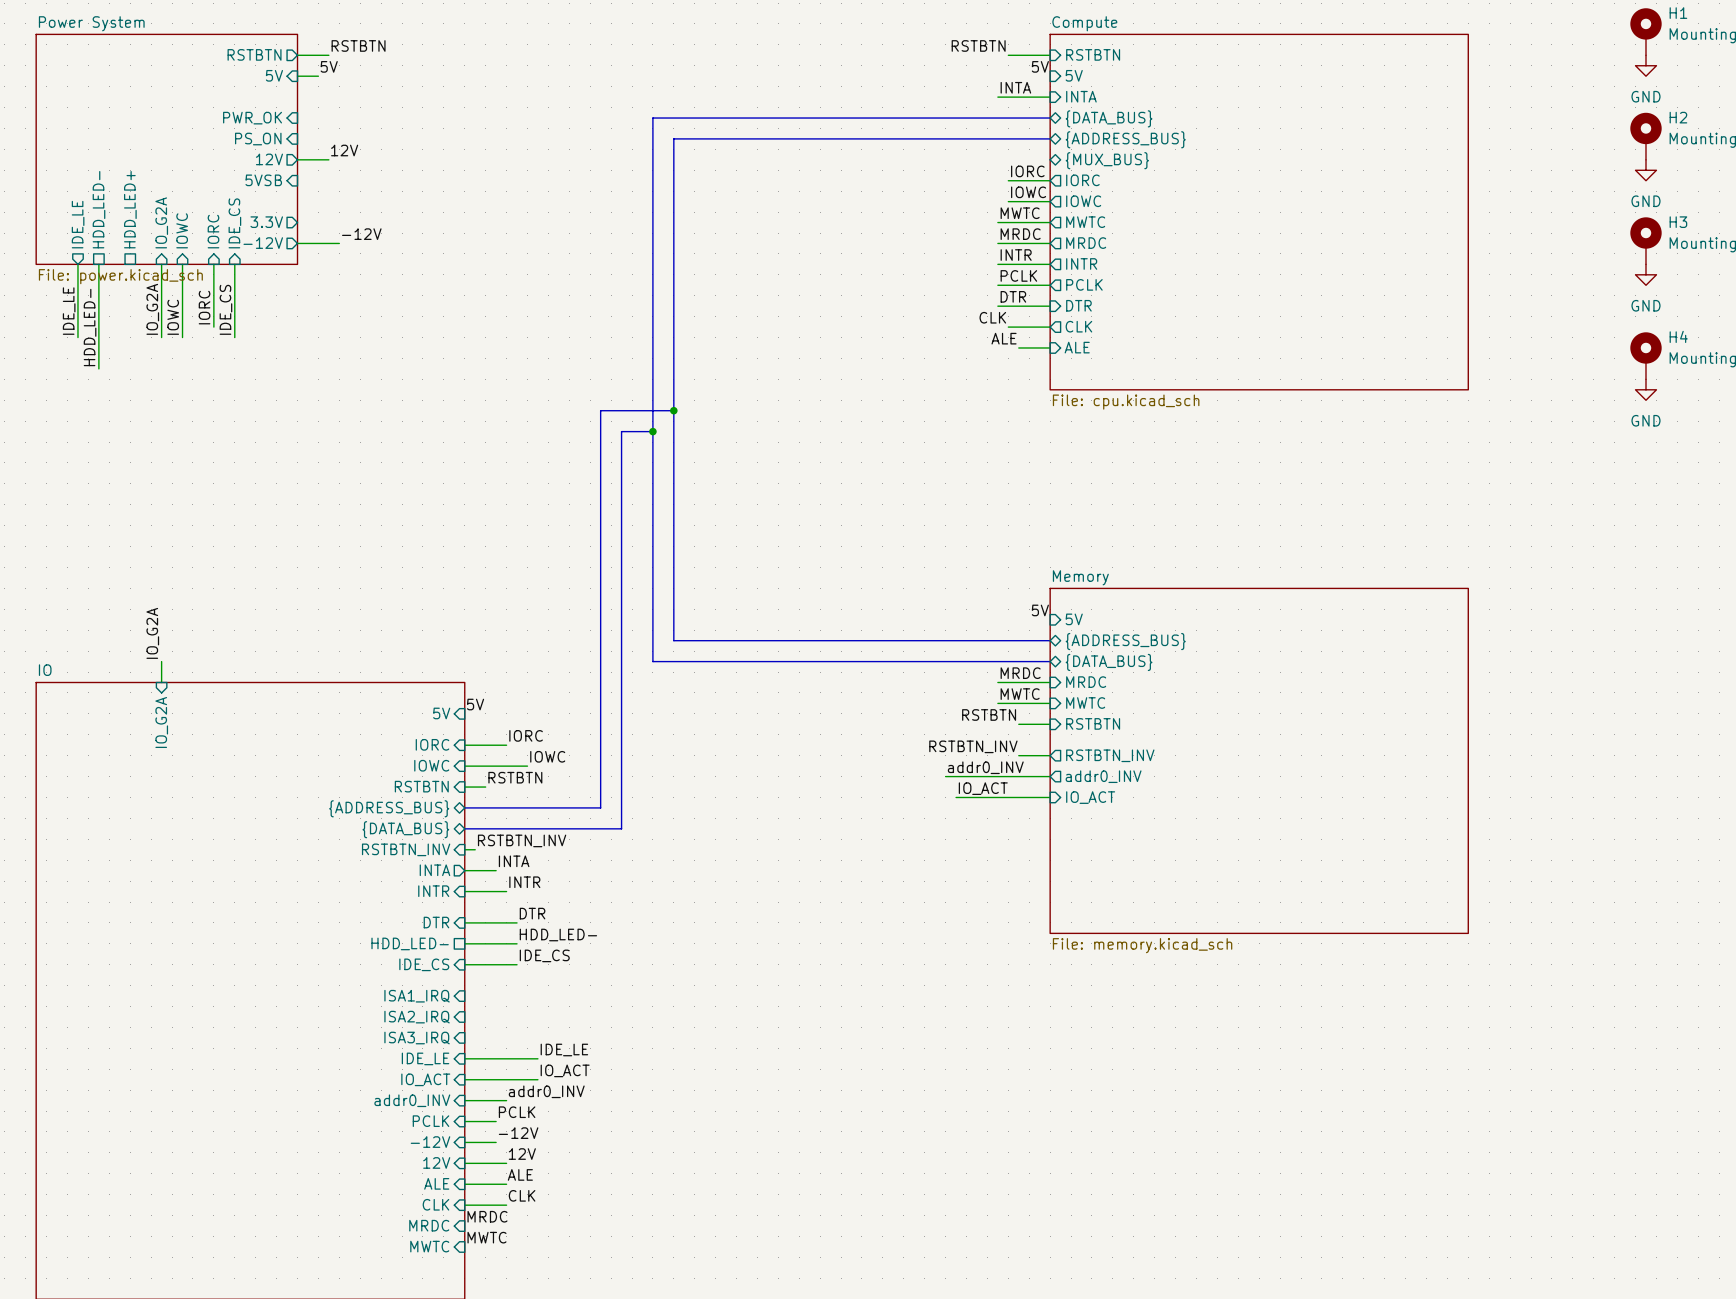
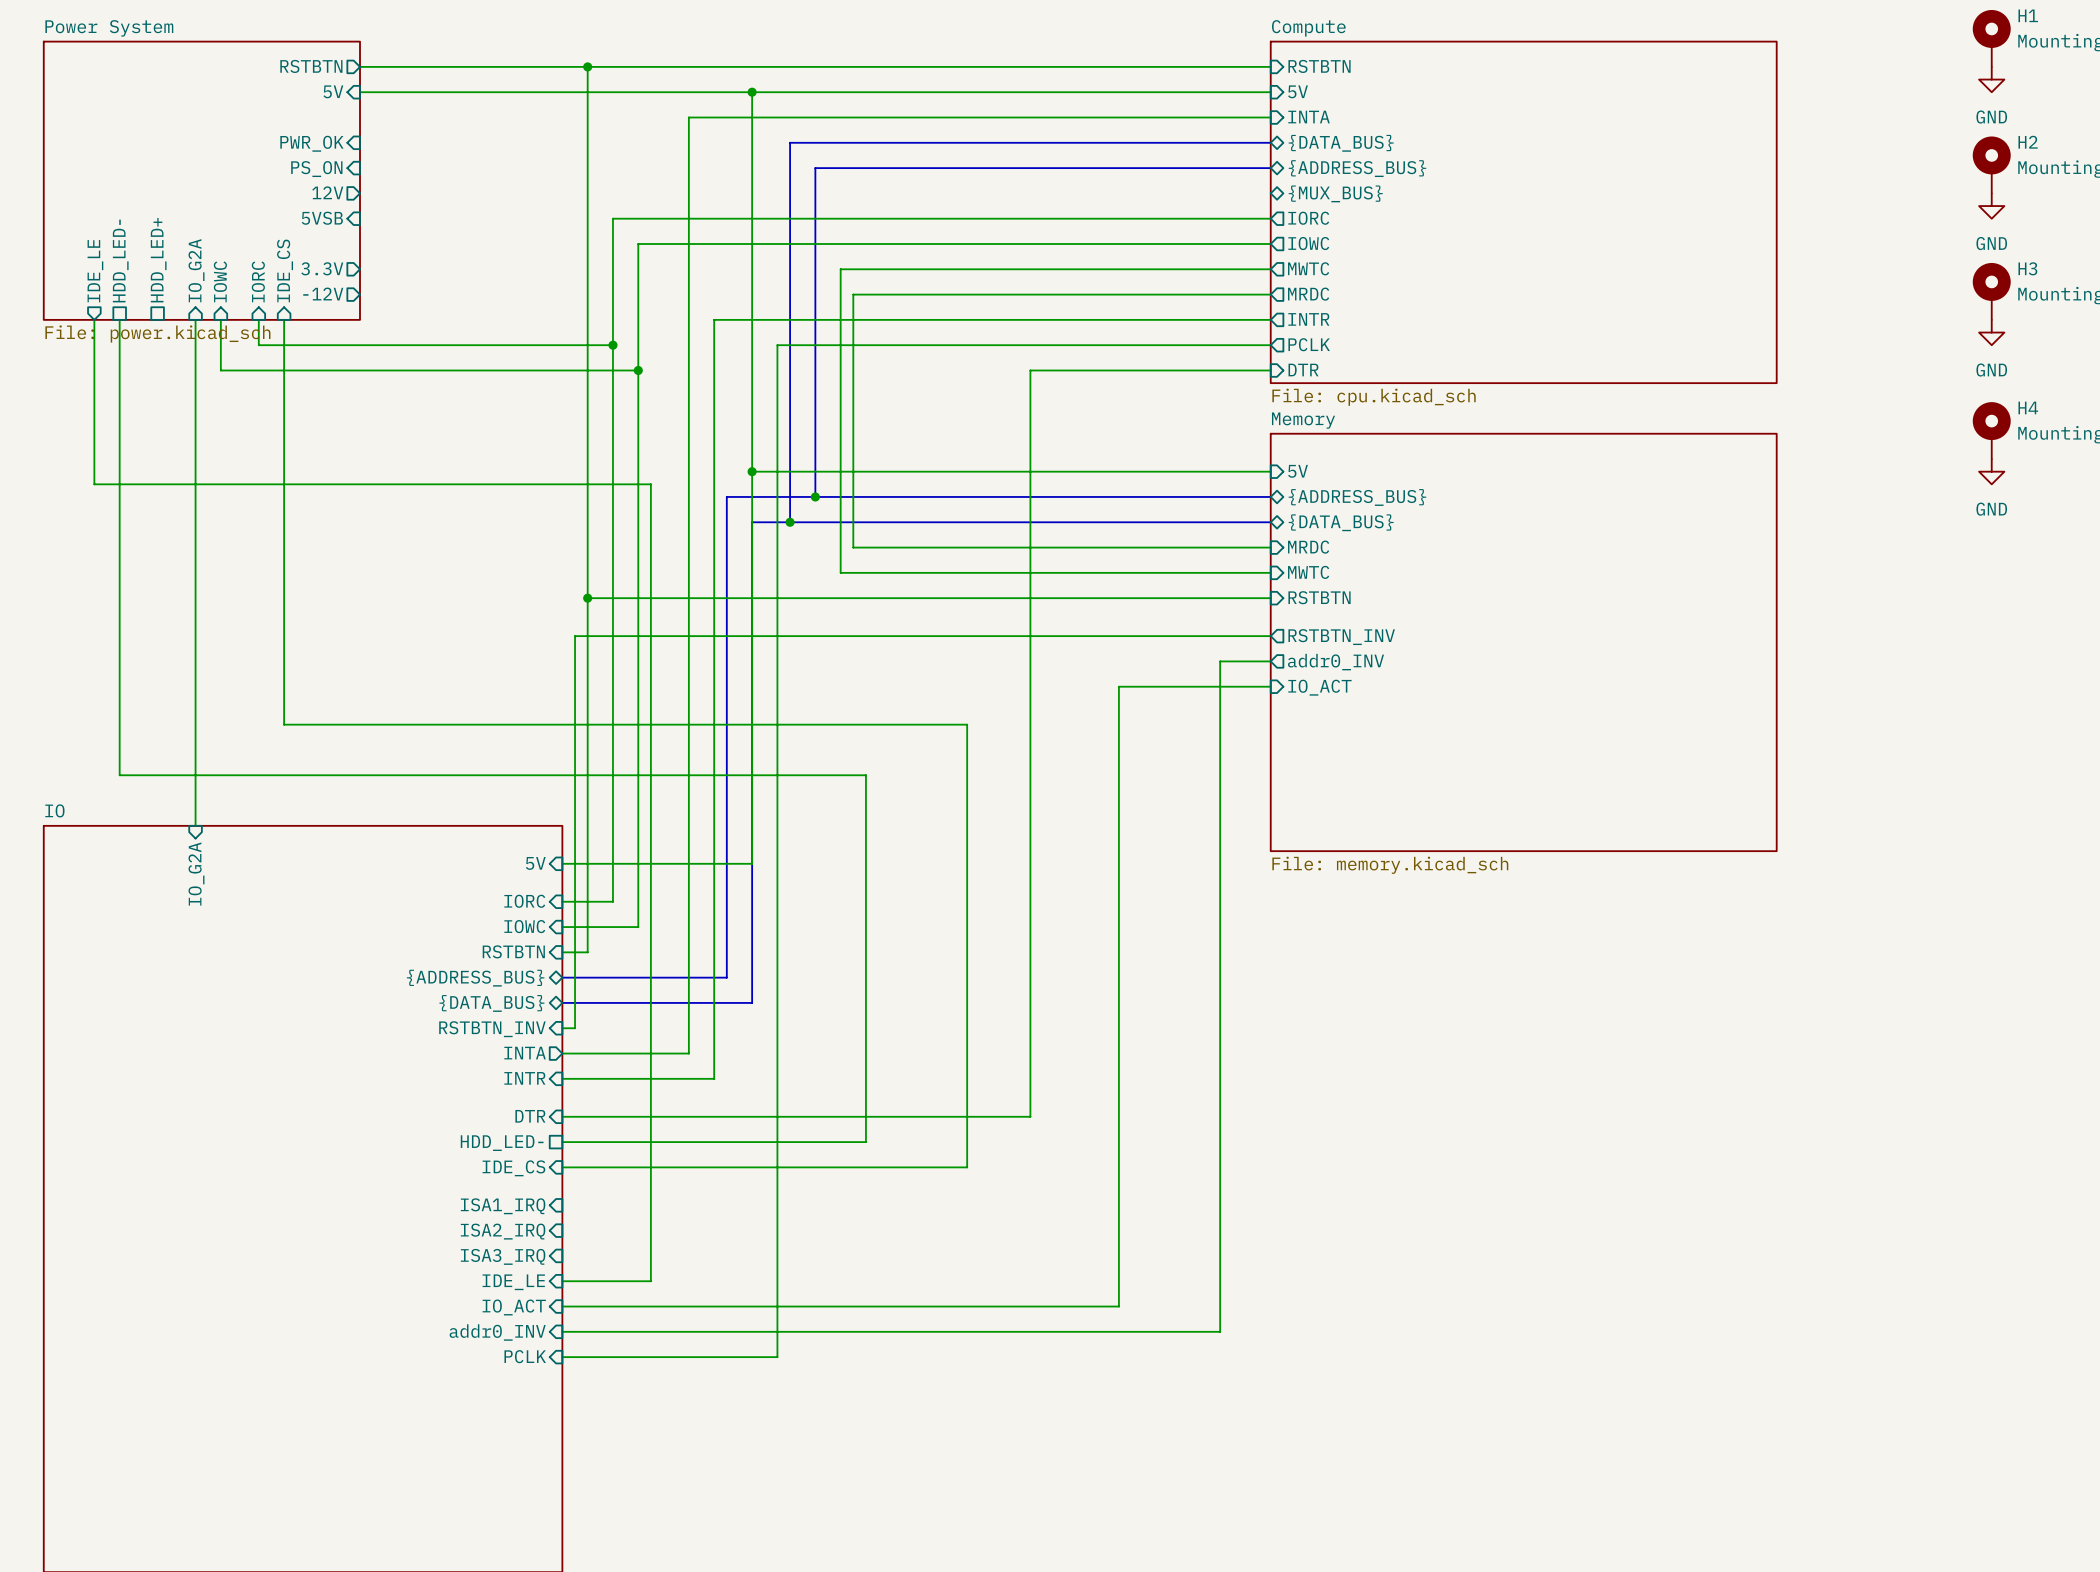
label: RSTBTN (358, 45) -> none
label: RSTBTN (978, 45) -> none
wire: none -> (397, 66) (1220, 66)
wire: none -> (587, 66) (587, 952)
junction: none -> (587, 66)
label: 5V (329, 66) -> none
label: 5V (1040, 66) -> none
wire: none -> (385, 92) (1270, 92)
wire: none -> (752, 92) (752, 863) (562, 863)
junction: none -> (752, 92)
label: INTA (1015, 87) -> none
wire: none -> (1207, 117) (688, 117) (688, 1053) (600, 1053)
label: 12V (344, 150) -> none
wire: (297, 159) (328, 159) -> none
label: IORC (1027, 171) -> none
sheet Compute: none -> File: cpu.kicad_sch (1523, 212)
wire: none -> (1220, 218) (612, 218) (612, 901)
label: IOWC (1028, 192) -> none
wire: none -> (1220, 244) (638, 244) (638, 927)
sheet Compute: File: cpu.kicad_sch (1259, 212) -> none
label: MWTC (1020, 213) -> none
wire: none -> (1207, 269) (840, 269) (840, 572) (1270, 572)
label: -12V (361, 234) -> none
label: MRDC (1020, 234) -> none
wire: (297, 243) (339, 243) -> none
wire: none -> (1207, 294) (853, 294) (853, 547) (1270, 547)
label: INTR (1016, 255) -> none
wire: none -> (1207, 319) (714, 319) (714, 1078) (612, 1078)
label: PCLK (1018, 275) -> none
wire: (213, 285) (213, 327) -> (258, 345) (612, 345)
junction: none -> (612, 345)
wire: none -> (1207, 345) (777, 345) (777, 1357) (600, 1357)
label: DTR (1013, 296) -> none
wire: (182, 306) (182, 337) -> (220, 370) (638, 370)
junction: none -> (638, 370)
wire: none -> (1207, 370) (1030, 370) (1030, 1116) (625, 1116)
label: IORC (204, 307) -> none
label: IO_G2A (152, 309) -> none
label: IDE_CS (225, 309) -> none
label: IDE_LE (69, 311) -> none
label: IOWC (173, 317) -> none
label: CLK (992, 317) -> none
sheet pin: CLK (1078, 326) -> none
label: HDD_LED- (90, 327) -> none
wire: (1008, 327) (1050, 327) -> none
wire: none -> (94, 408) (94, 484) (650, 484) (650, 1281)
wire: none -> (195, 408) (195, 800)
wire: none -> (284, 408) (284, 724) (967, 724) (967, 1167) (625, 1167)
label: ALE (1004, 338) -> none
wire: (1018, 347) (1050, 347) -> none
sheet pin: ALE (1077, 347) -> none
wire: none -> (119, 446) (119, 775) (865, 775) (865, 1142) (625, 1142)
wire: none -> (752, 471) (1270, 471)
junction: none -> (752, 471)
sheet pin: none -> 5V (1298, 471)
bus: (673, 410) (673, 640) (1050, 640) -> (815, 496) (1270, 496)
sheet pin: none -> {ADDRESS_BUS} (1357, 497)
bus: (652, 431) (652, 661) (1050, 661) -> (790, 522) (1270, 522)
sheet pin: none -> {DATA_BUS} (1341, 522)
sheet pin: none -> MRDC (1308, 547)
sheet pin: none -> MWTC (1308, 572)
sheet pin: none -> RSTBTN (1319, 597)
wire: none -> (587, 598) (1270, 598)
junction: none -> (587, 598)
wire: none -> (1270, 636) (575, 636) (575, 1028)
sheet pin: none -> RSTBTN_INV (1341, 637)
sheet Memory: none -> File: memory.kicad_sch (1523, 642)
wire: none -> (1270, 661) (1220, 661) (1220, 1331) (612, 1331)
sheet pin: none -> addr0_INV (1336, 662)
wire: none -> (1270, 686) (1118, 686) (1118, 1306) (650, 1306)
sheet pin: none -> IO_ACT (1319, 687)
label: 5V (1040, 610) -> none
sheet pin: 5V (1074, 619) -> none
label: IO_G2A (152, 633) -> none
sheet pin: {ADDRESS_BUS} (1125, 641) -> none
sheet pin: {DATA_BUS} (1109, 662) -> none
label: MRDC (1020, 673) -> none
wire: (997, 682) (1050, 682) -> none
sheet pin: MRDC (1086, 682) -> none
label: MWTC (1020, 694) -> none
wire: (997, 703) (1050, 703) -> none
sheet pin: MWTC (1085, 703) -> none
label: 5V (475, 704) -> none
label: RSTBTN (989, 714) -> none
sheet pin: RSTBTN (1093, 723) -> none
wire: (1018, 724) (1050, 724) -> none
label: IORC (526, 735) -> none
label: RSTBTN_INV (973, 746) -> none
wire: (1018, 755) (1050, 755) -> none
sheet pin: RSTBTN_INV (1110, 755) -> none
label: IOWC (547, 756) -> none
sheet Memory: File: memory.kicad_sch (1259, 760) -> none
label: addr0_INV (985, 767) -> none
wire: (945, 776) (1050, 776) -> none
sheet pin: addr0_INV (1103, 776) -> none
label: RSTBTN (515, 777) -> none
label: IO_ACT (983, 788) -> none
wire: (956, 797) (1050, 797) -> none
sheet pin: IO_ACT (1090, 797) -> none
label: RSTBTN_INV (522, 840) -> none
label: INTA (514, 861) -> none
label: INTR (524, 882) -> none
label: DTR (532, 913) -> none
label: HDD_LED- (558, 935) -> none
label: IDE_CS (544, 955) -> none
label: IDE_LE (564, 1049) -> none
label: IO_ACT (565, 1070) -> none
label: addr0_INV (546, 1091) -> none
label: PCLK (517, 1112) -> none
label: -12V (518, 1133) -> none
sheet pin: -12V (430, 1142) -> none
wire: (464, 1142) (496, 1142) -> none
label: 12V (522, 1154) -> none
sheet pin: 12V (436, 1162) -> none
wire: (464, 1163) (506, 1163) -> none
label: ALE (520, 1174) -> none
sheet pin: ALE (436, 1183) -> none
wire: (464, 1184) (506, 1184) -> none
label: CLK (522, 1195) -> none
sheet pin: CLK (435, 1204) -> none
wire: (464, 1205) (506, 1205) -> none
label: MRDC (487, 1216) -> none
sheet pin: MRDC (429, 1225) -> none
label: MWTC (486, 1237) -> none
sheet pin: MWTC (429, 1246) -> none

